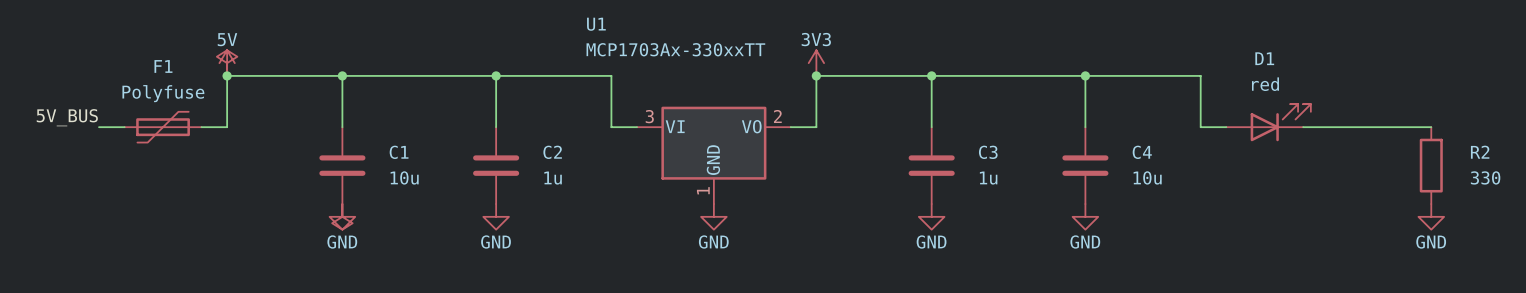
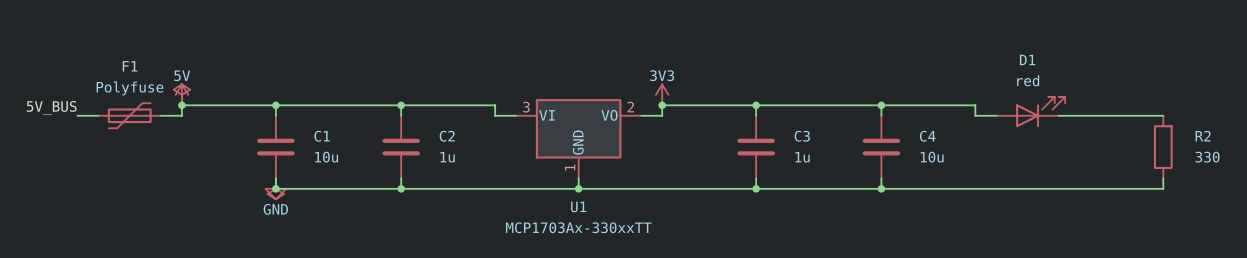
U1 name position: U1 (596, 24) -> U1 (578, 206)
U1 value position: MCP1703Ax-330xxTT (675, 49) -> MCP1703Ax-330xxTT (578, 227)
power symbol position: (227, 63) -> (181, 94)
power symbol position: 5V (227, 63) -> 5V (181, 94)
power symbol position: 3V3 (816, 63) -> 3V3 (662, 94)
junction position: (227, 75) -> (181, 105)
wire: (342, 75) (342, 114) -> none
junction position: (342, 75) -> (275, 105)
wire: (496, 75) (496, 114) -> none
junction position: (496, 75) -> (401, 105)
junction position: (816, 75) -> (662, 105)
wire: (931, 75) (931, 114) -> none
junction position: (931, 75) -> (756, 105)
wire: (1085, 75) (1085, 114) -> none
junction position: (1085, 75) -> (881, 105)
wire: (227, 114) (227, 75) (611, 75) (611, 114) -> (181, 105) (495, 105)
wire: (816, 114) (816, 75) (1200, 75) (1200, 114) -> (662, 105) (975, 105)
wire: none -> (275, 178) (275, 188) (1163, 188) (1163, 178)
junction: none -> (275, 188)
junction: none -> (401, 188)
power symbol: GND (496, 216) -> none
junction: none -> (578, 188)
power symbol: GND (713, 216) -> none
junction: none -> (756, 188)
power symbol: GND (931, 216) -> none
junction: none -> (881, 188)
power symbol: GND (1085, 216) -> none
power symbol: GND (1431, 216) -> none

